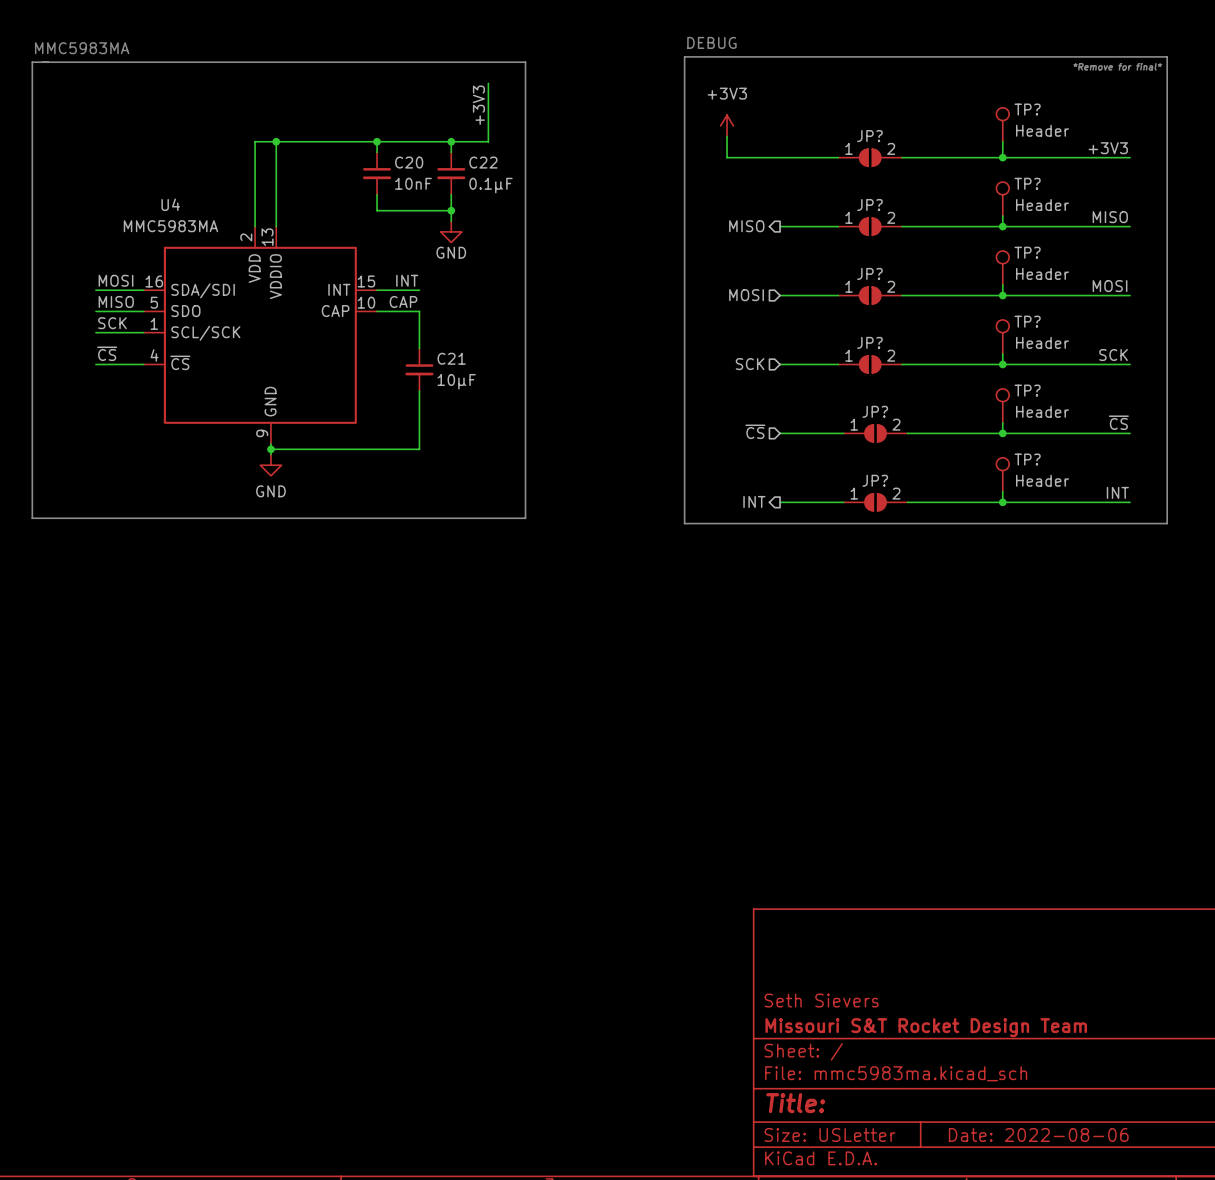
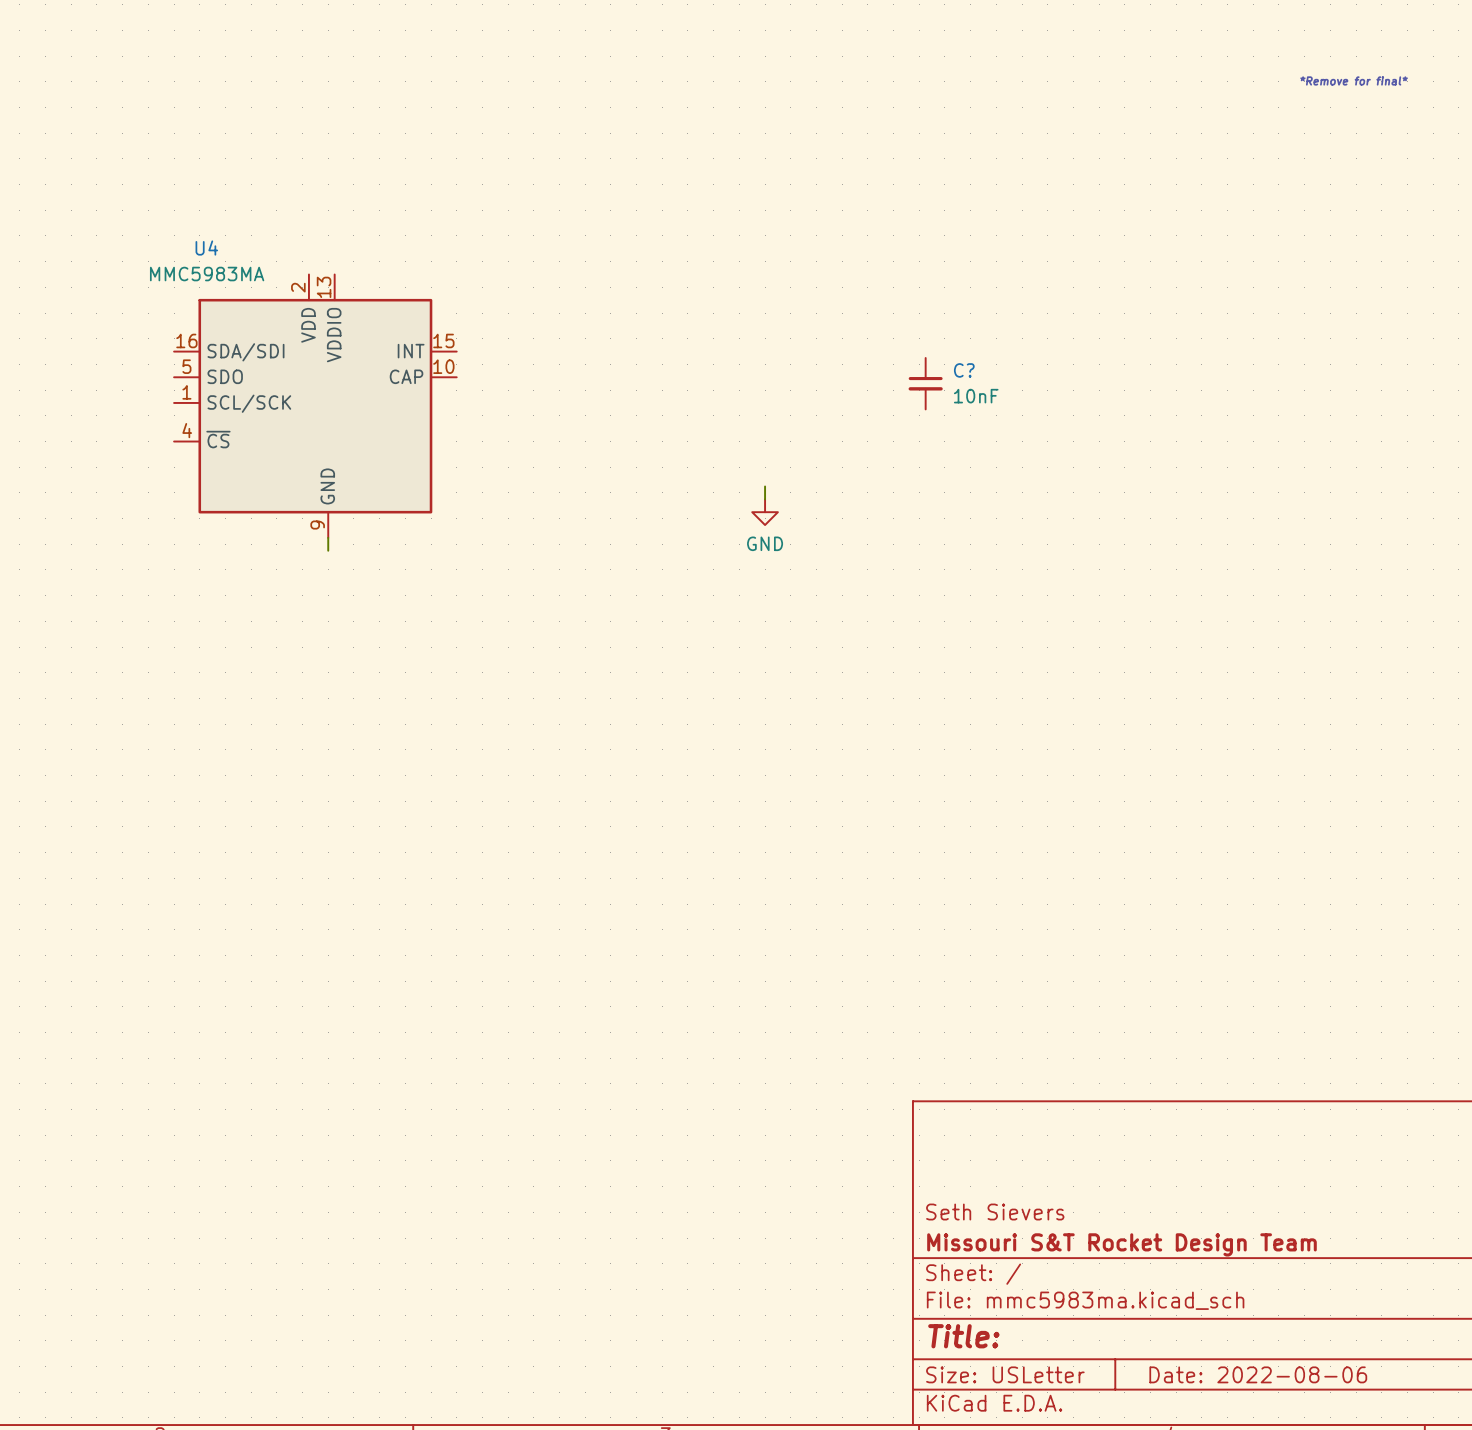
text: DEBUG (711, 42) -> none
text: MMC5983MA (82, 48) -> none
line: (684, 56) (684, 523) (1167, 523) (1167, 56) (684, 56) -> none
line: (32, 62) (525, 62) (525, 518) (32, 518) (32, 62) -> none
wire: (488, 83) (488, 141) (255, 141) (255, 226) -> none
label: +3V3 (478, 105) -> none
TP?: Header (1002, 124) -> none
power symbol: +3V3 (727, 125) -> none
wire: (727, 136) (727, 157) (838, 157) -> none
wire: (276, 141) (276, 226) -> none
junction: (276, 141) -> none
wire: (377, 141) (377, 152) -> none
junction: (377, 141) -> none
wire: (451, 141) (451, 152) -> none
junction: (451, 141) -> none
wire: (1002, 141) (1002, 157) -> none
label: +3V3 (1108, 148) -> none
JP?: (870, 157) -> none
wire: (902, 157) (1130, 157) -> none
junction: (1002, 157) -> none
C20: 10nF (377, 173) -> none
C22: 0.1μF (451, 173) -> none
wire: (377, 194) (377, 210) (451, 210) -> none
wire: (451, 194) (451, 221) -> none
TP?: Header (1002, 199) -> none
junction: (451, 210) -> none
wire: (1002, 215) (1002, 226) -> none
label: MISO (1110, 217) -> none
hierarchical label: MISO (746, 226) -> none
wire: (780, 226) (838, 226) -> none
JP?: (870, 226) -> none
wire: (902, 226) (1130, 226) -> none
junction: (1002, 226) -> none
power symbol: GND (451, 231) -> none
TP?: Header (1002, 267) -> none
label: MOSI (116, 280) -> none
label: INT (407, 280) -> none
wire: (1002, 284) (1002, 295) -> none
label: MOSI (1110, 286) -> none
wire: (95, 290) (143, 290) -> none
wire: (377, 290) (419, 290) -> none
hierarchical label: MOSI (746, 295) -> none
wire: (780, 295) (838, 295) -> none
JP?: (870, 295) -> none
wire: (902, 295) (1130, 295) -> none
junction: (1002, 295) -> none
label: MISO (116, 301) -> none
label: CAP (403, 301) -> none
wire: (95, 311) (143, 311) -> none
wire: (377, 311) (419, 311) (419, 348) -> none
C?: none -> 10nF (925, 383)
label: SCK (112, 323) -> none
wire: (95, 332) (143, 332) -> none
TP?: Header (1002, 336) -> none
label: ~{CS} (107, 353) -> none
wire: (1002, 353) (1002, 364) -> none
label: SCK (1113, 355) -> none
wire: (95, 364) (143, 364) -> none
hierarchical label: SCK (750, 364) -> none
wire: (780, 364) (838, 364) -> none
JP?: (870, 364) -> none
wire: (902, 364) (1130, 364) -> none
junction: (1002, 364) -> none
C21: 10μF (419, 369) -> none
wire: (419, 390) (419, 449) (270, 449) -> none
wire: none -> (765, 486) (765, 499)
TP?: Header (1002, 405) -> none
power symbol: none -> GND (765, 512)
wire: (1002, 422) (1002, 433) -> none
label: ~{CS} (1118, 422) -> none
hierarchical label: ~{CS} (755, 431) -> none
wire: (780, 433) (843, 433) -> none
JP?: (875, 433) -> none
wire: (907, 433) (1130, 433) -> none
junction: (1002, 433) -> none
junction: (270, 449) -> none
power symbol: GND (270, 465) -> none
TP?: Header (1002, 474) -> none
wire: (1002, 491) (1002, 502) -> none
label: INT (1117, 492) -> none
hierarchical label: INT (754, 501) -> none
wire: (780, 502) (843, 502) -> none
JP?: (875, 502) -> none
wire: (907, 502) (1130, 502) -> none
junction: (1002, 502) -> none

